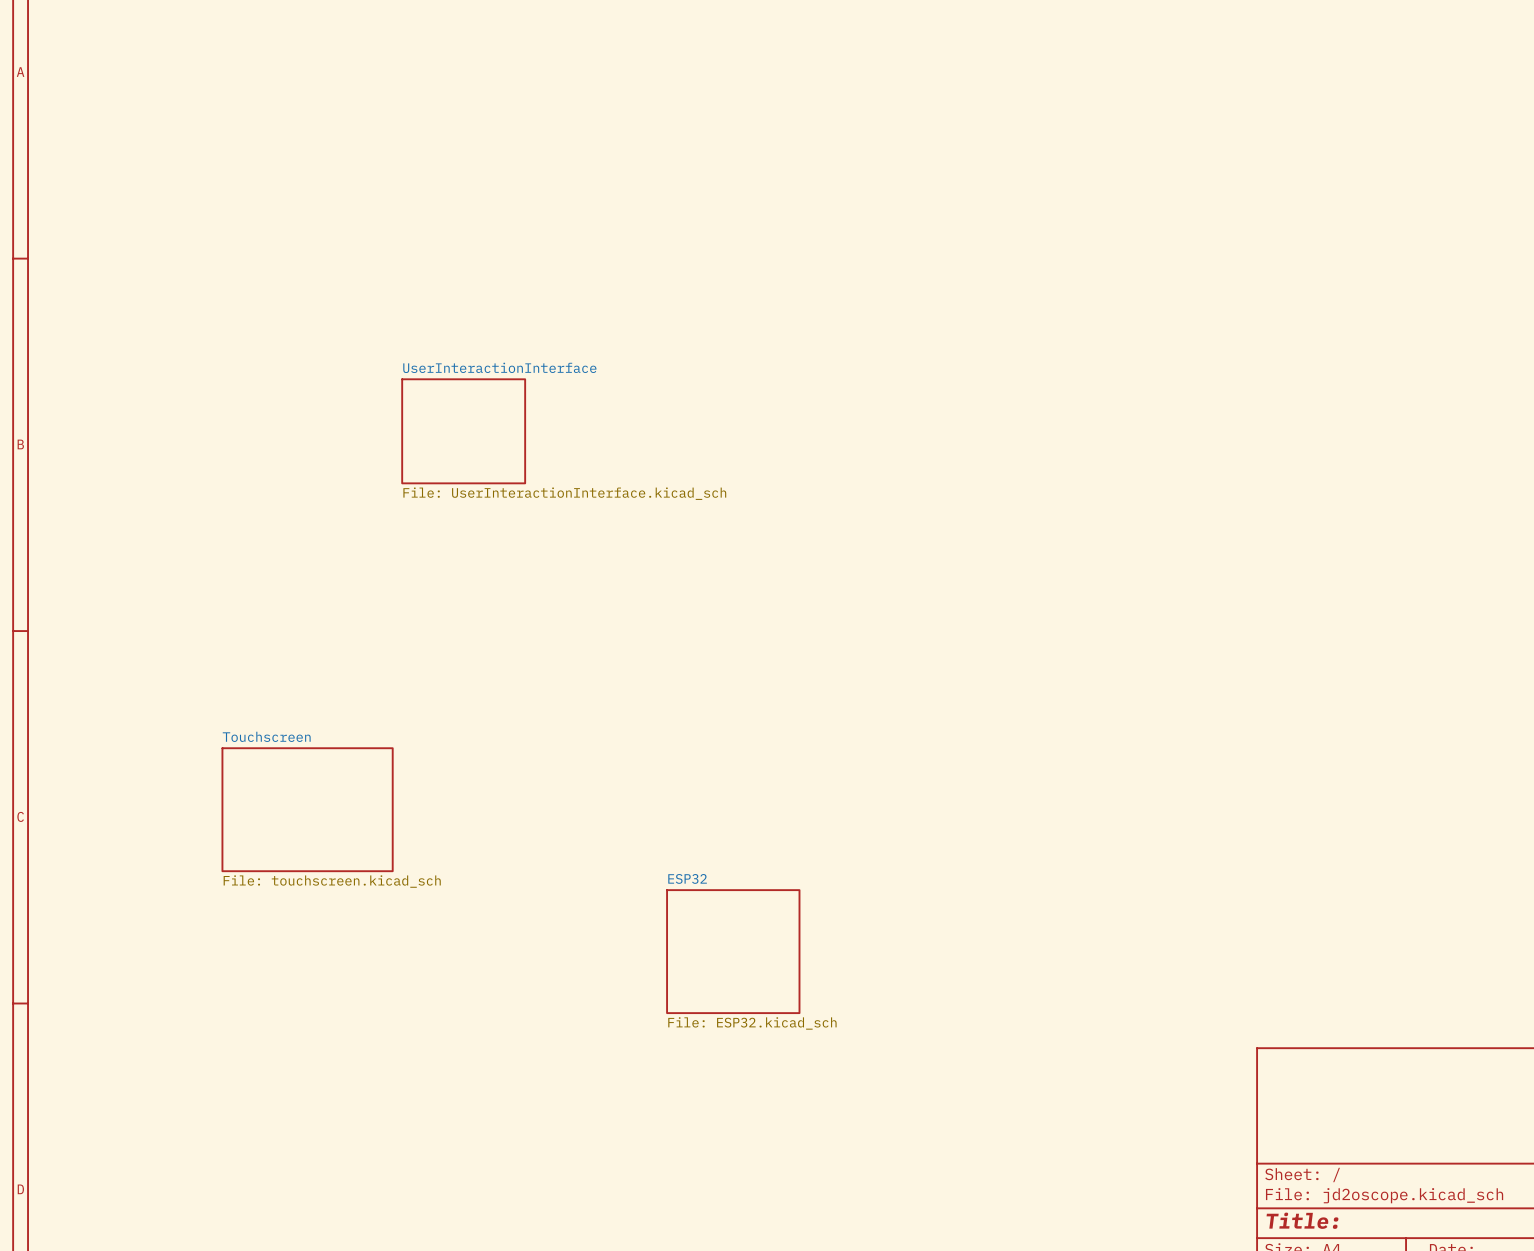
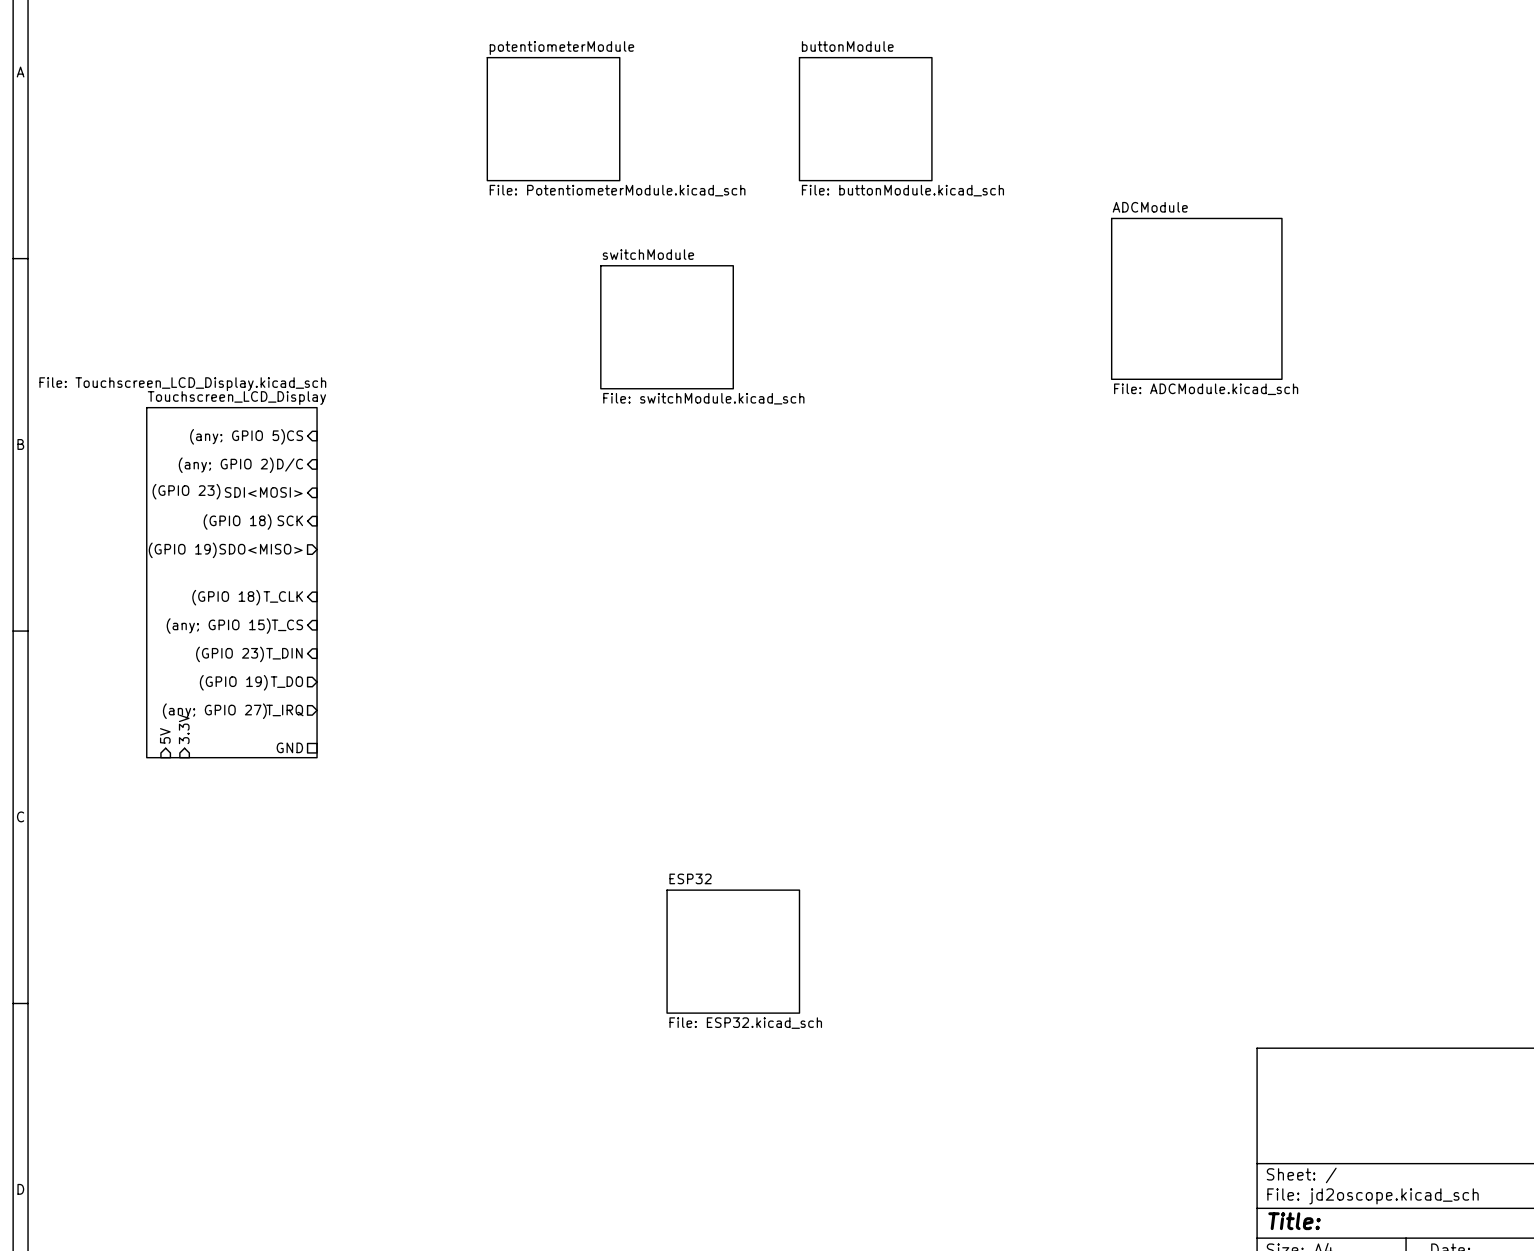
sheet potentiometerModule: none -> File: PotentiometerModule.kicad_sch (553, 119)
sheet buttonModule: none -> File: buttonModule.kicad_sch (865, 119)
sheet ADCModule: none -> File: ADCModule.kicad_sch (1196, 298)
sheet switchModule: none -> File: switchModule.kicad_sch (667, 327)
sheet UserInteractionInterface: File: UserInteractionInterface.kicad_sch (463, 431) -> none
sheet pin: none -> CS (295, 435)
text: none -> (any; GPIO 5) (237, 436)
sheet pin: none -> D/C (290, 464)
text: none -> (any; GPIO 2) (226, 465)
text: none -> (GPIO 23) (186, 491)
sheet pin: none -> SDI<MOSI> (263, 492)
sheet pin: none -> SCK (290, 520)
text: none -> (GPIO 18) (237, 521)
text: none -> (GPIO 19) (182, 550)
sheet pin: none -> SDO<MISO> (261, 549)
sheet Touchscreen_LCD_Display: none -> File: Touchscreen_LCD_Display.kicad_sch (231, 582)
text: none -> (GPIO 18) (226, 597)
sheet pin: none -> T_CLK (283, 596)
text: none -> (any; GPIO 15) (218, 626)
sheet pin: none -> T_CS (287, 625)
text: none -> (GPIO 23) (230, 654)
sheet pin: none -> T_DIN (284, 653)
text: none -> (GPIO 19) (233, 682)
sheet pin: none -> T_DO (286, 682)
text: none -> (any; GPIO 27) (214, 711)
sheet pin: none -> T_IRQ (284, 710)
sheet pin: none -> 3.3V (184, 729)
sheet pin: none -> 5V (165, 735)
sheet pin: none -> GND (289, 747)
sheet Touchscreen: File: touchscreen.kicad_sch (307, 809) -> none

